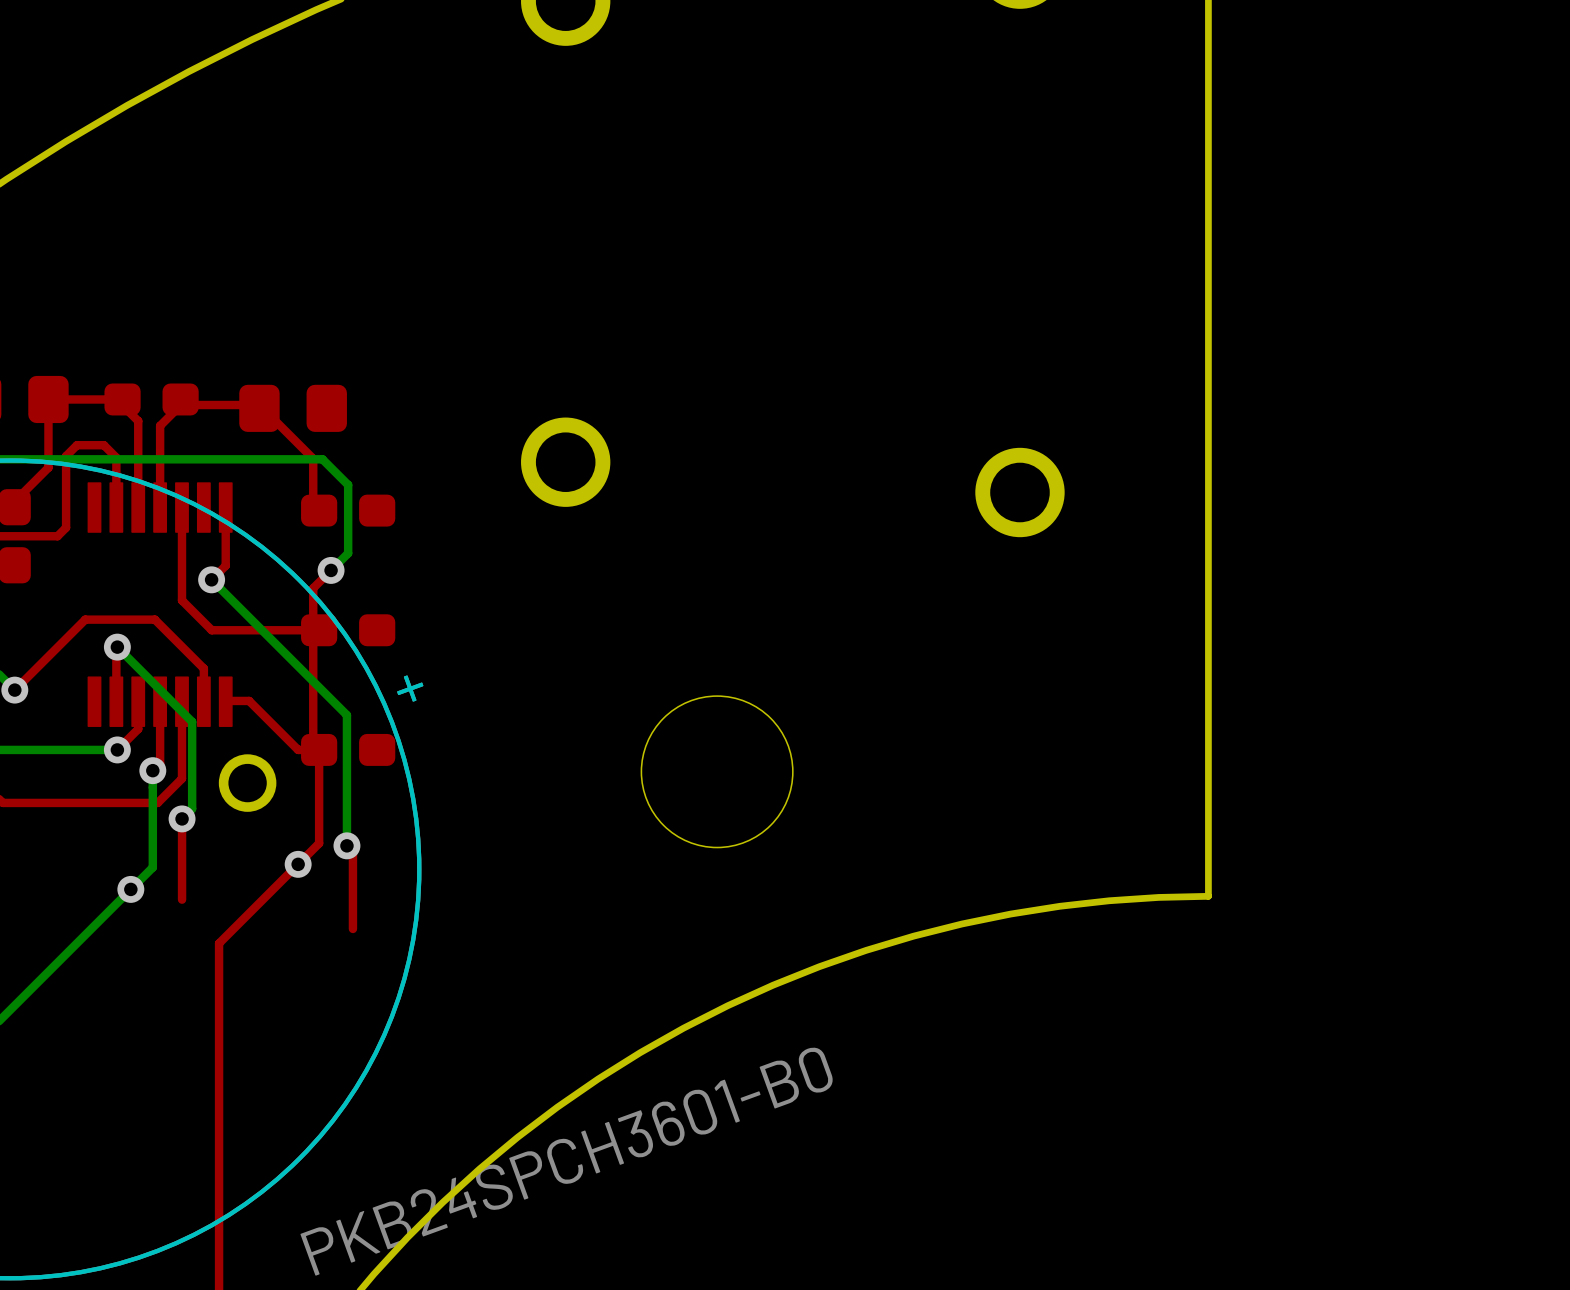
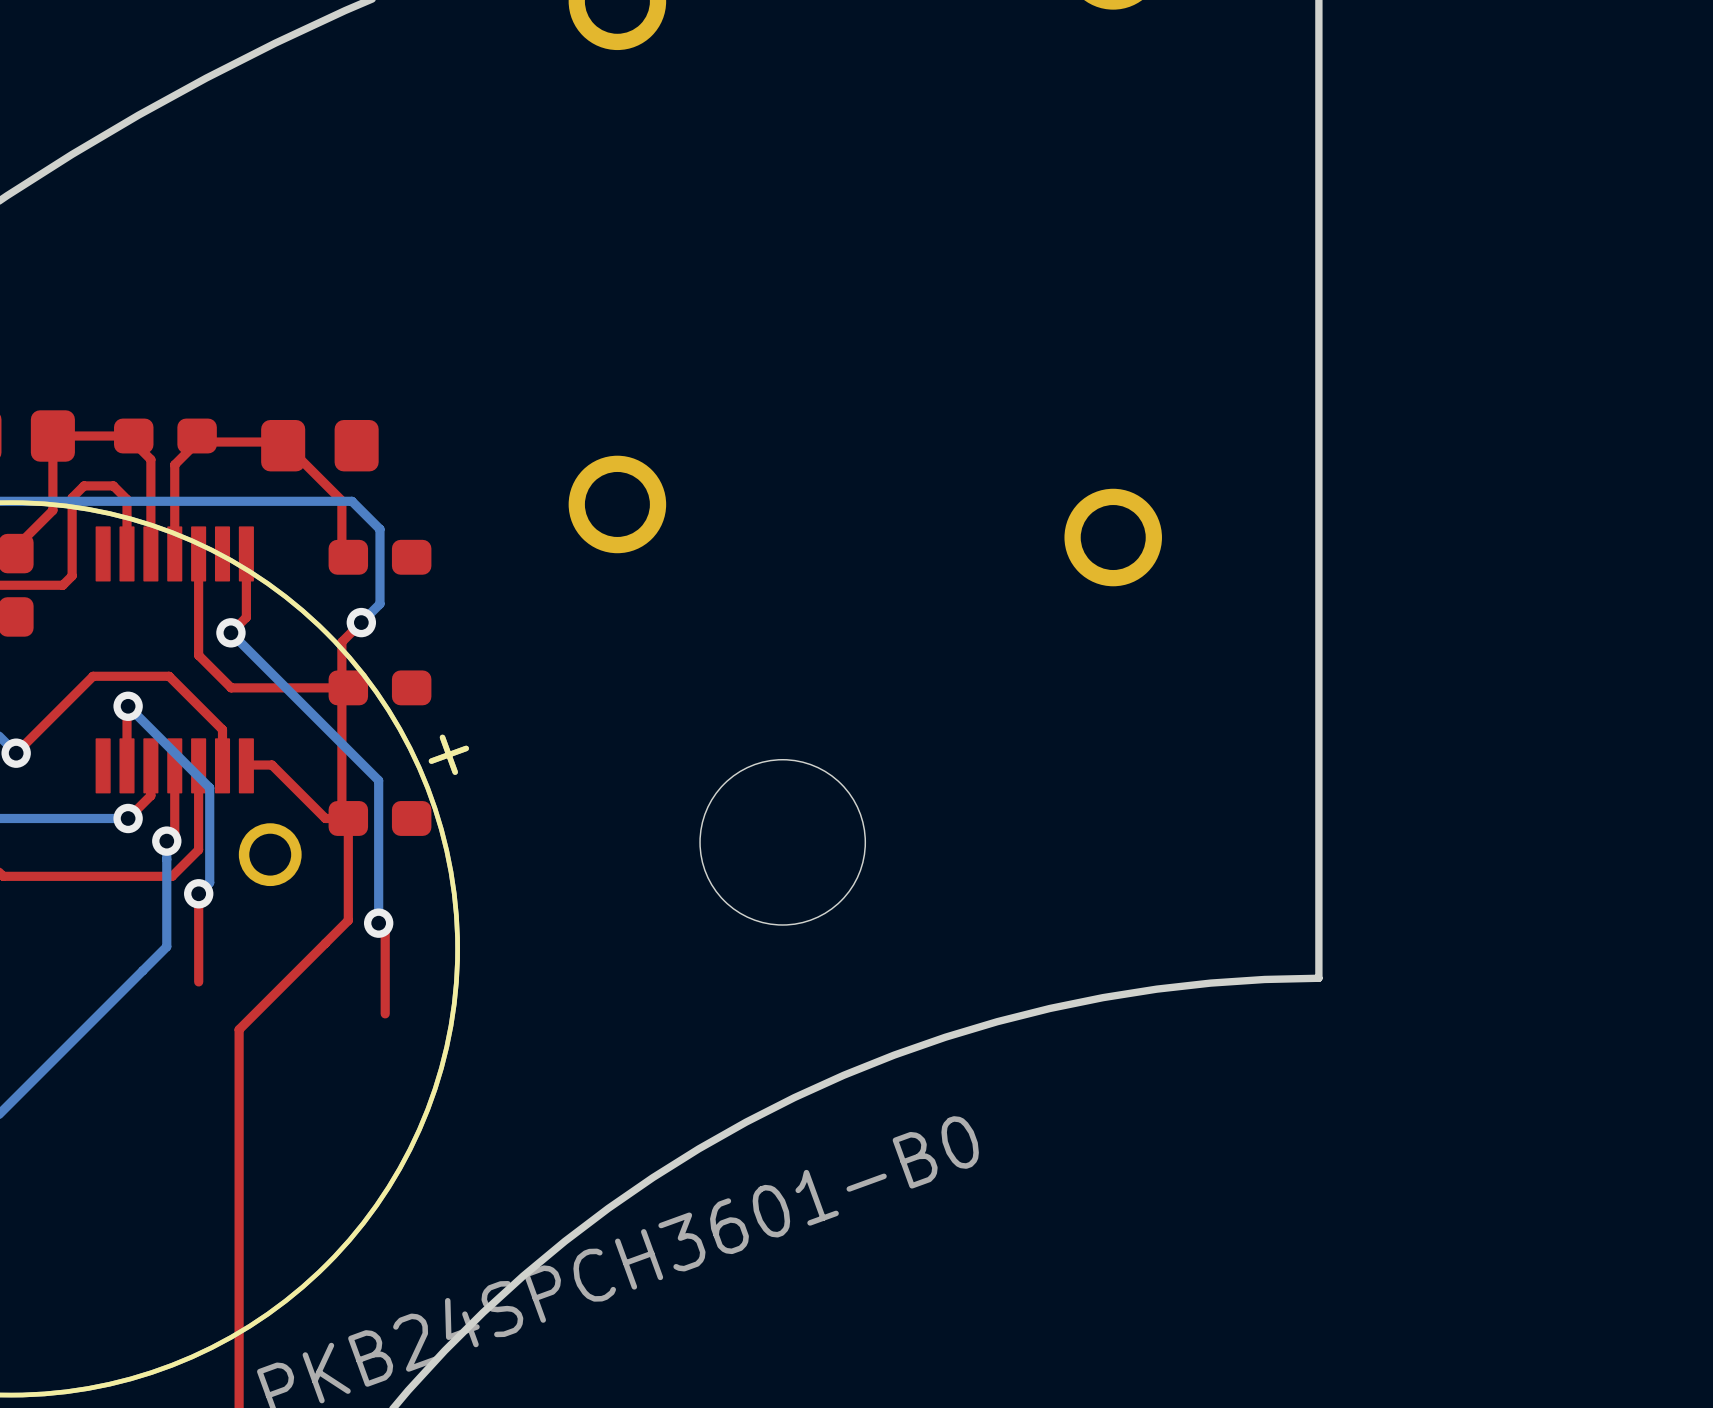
via: (298, 864) -> none
via: (130, 889) -> none

